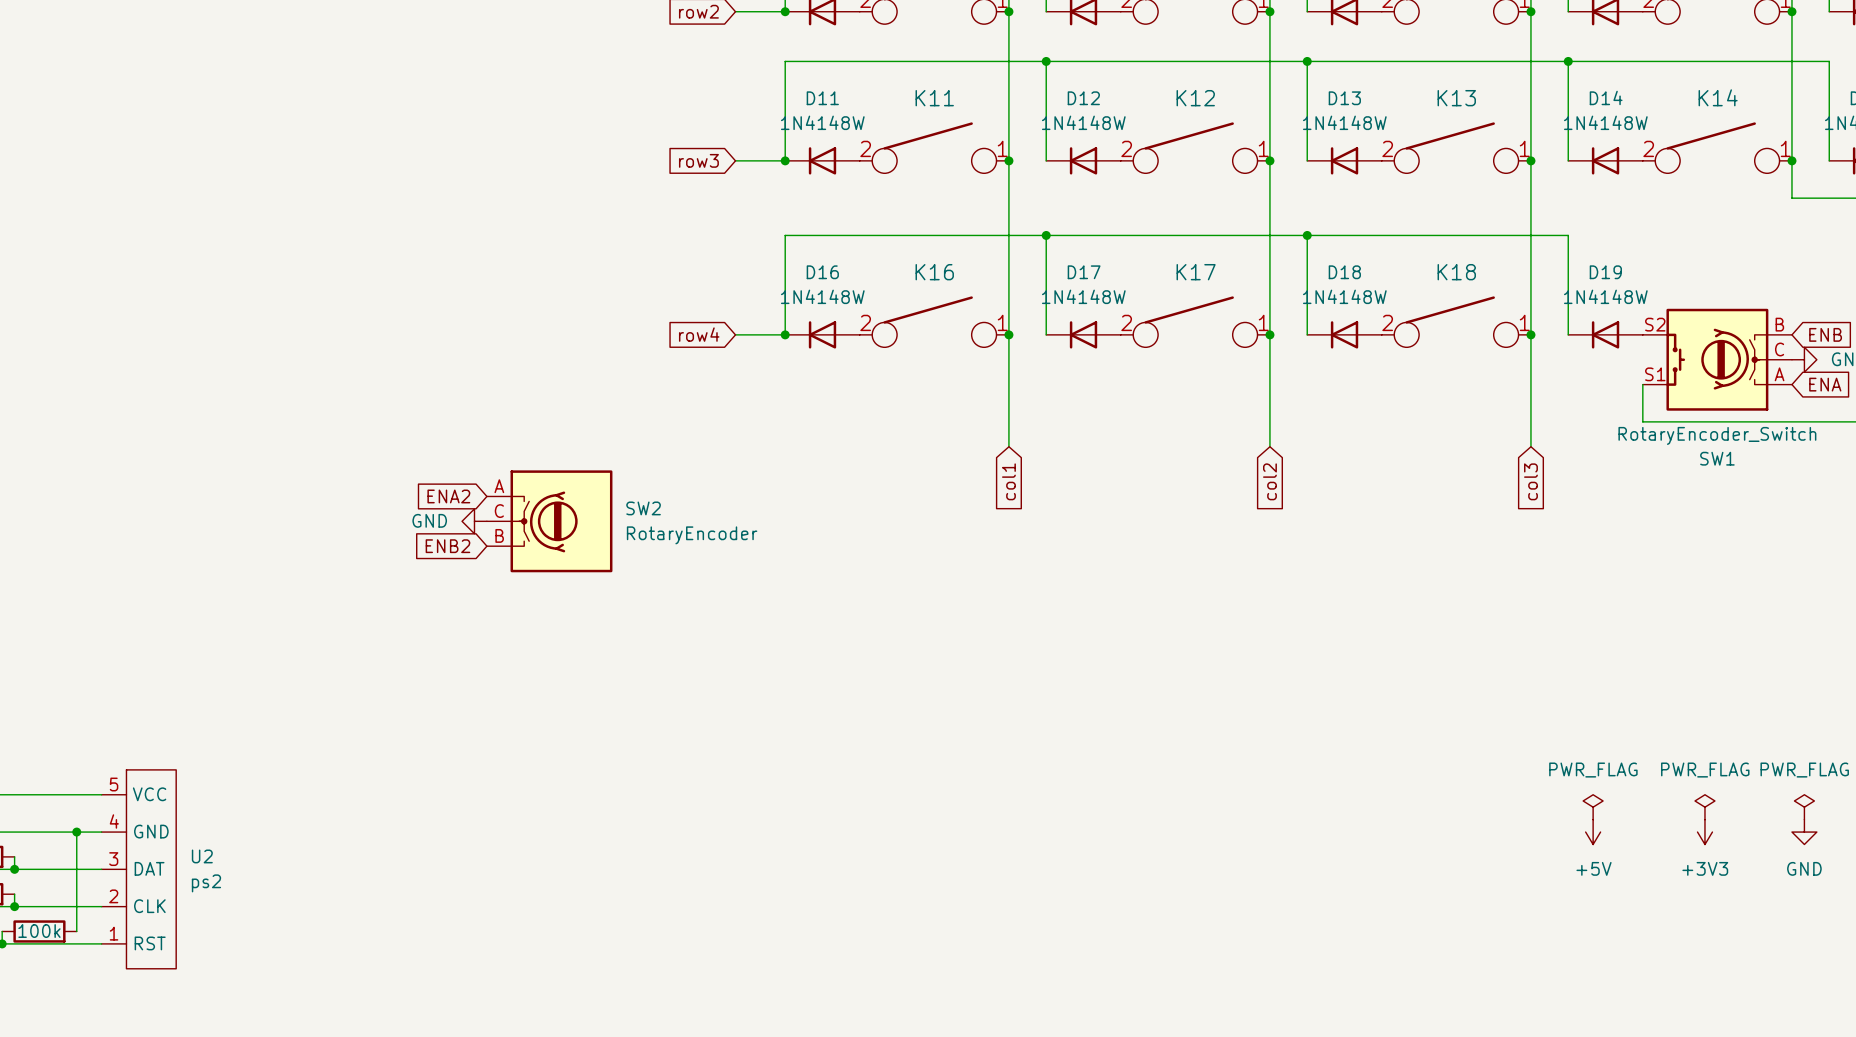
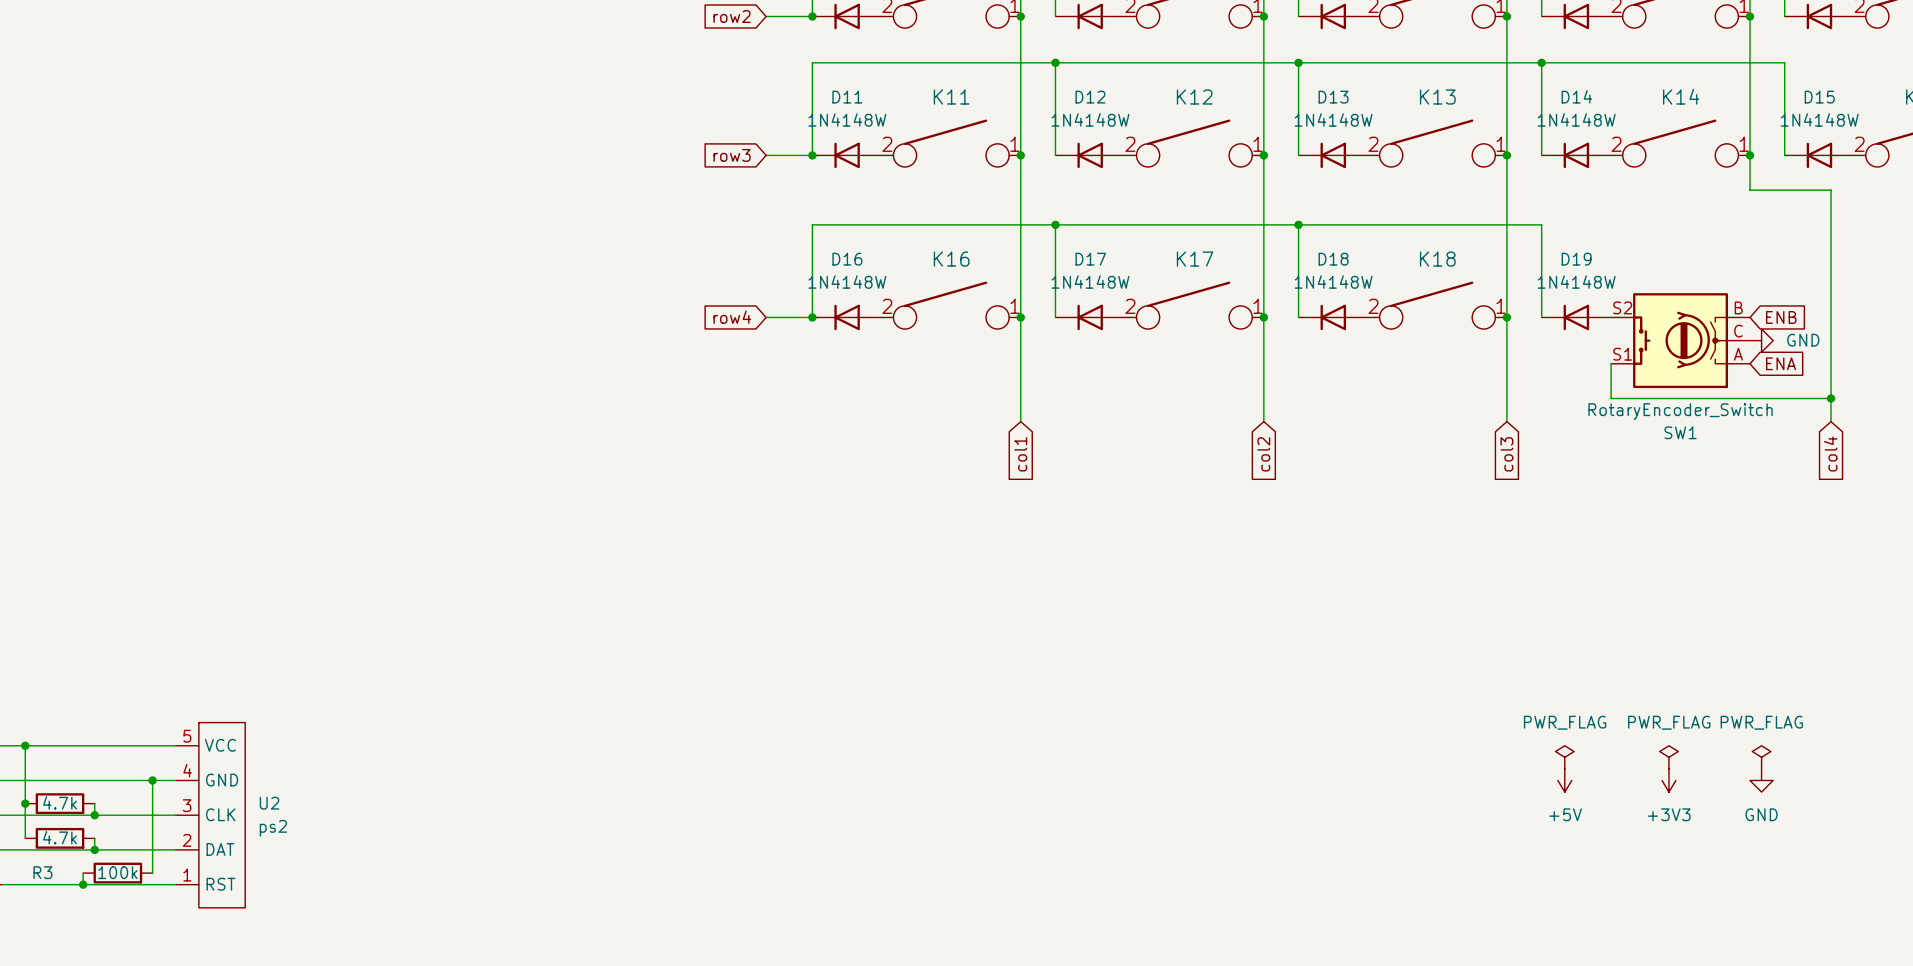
global label: ENA2 (448, 496) -> none
power symbol: GND (474, 521) -> none
SW2: RotaryEncoder (549, 521) -> none
global label: ENB2 (447, 546) -> none
U2 pin name: DAT (149, 868) -> CLK (220, 814)
U2 pin name: CLK (149, 906) -> DAT (220, 849)

